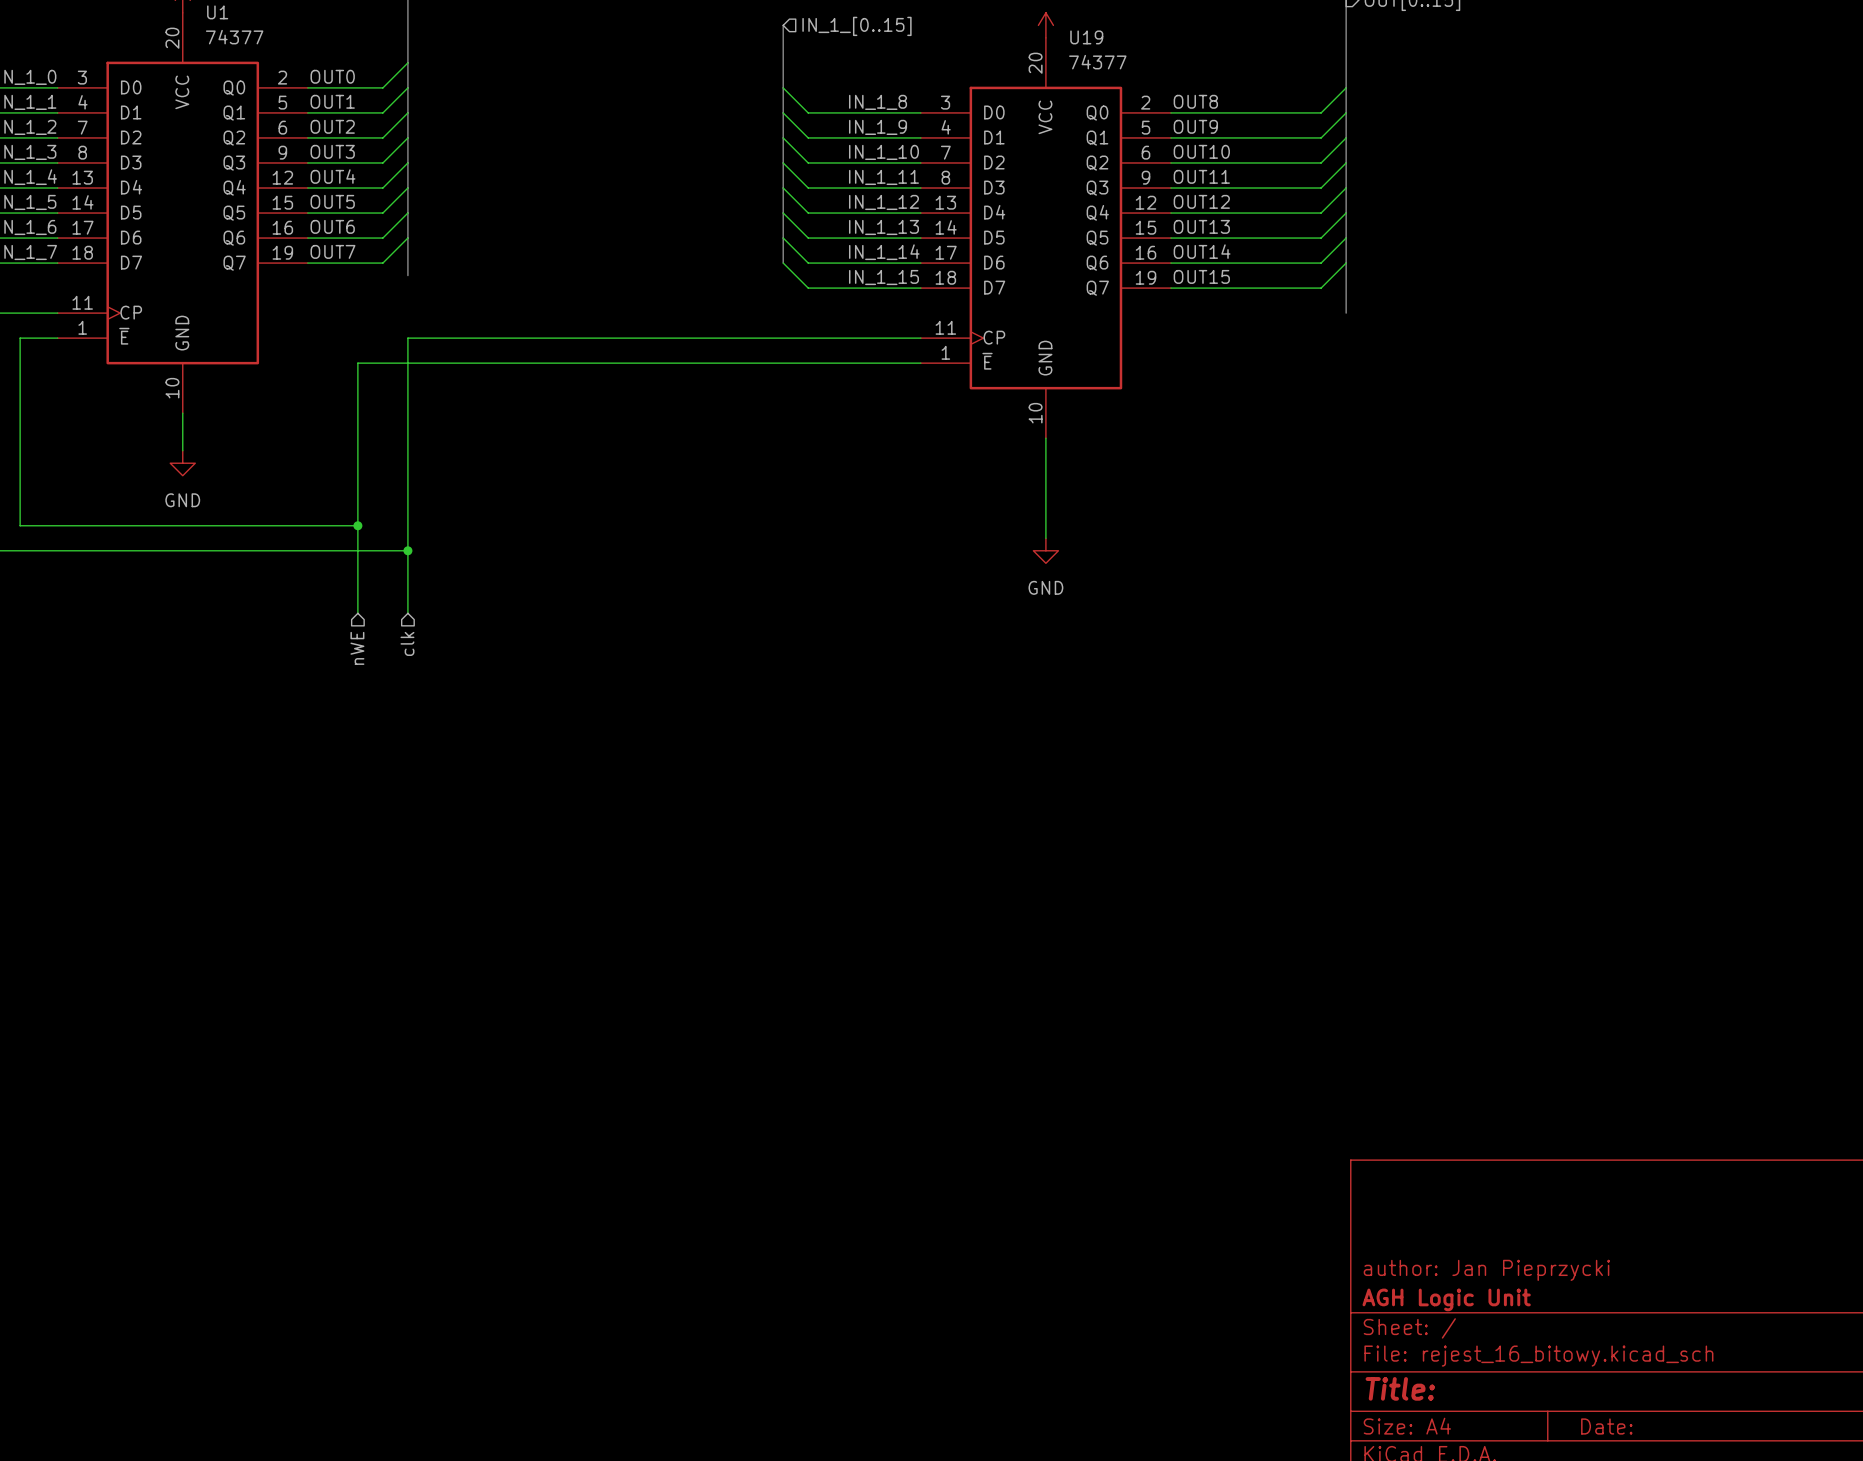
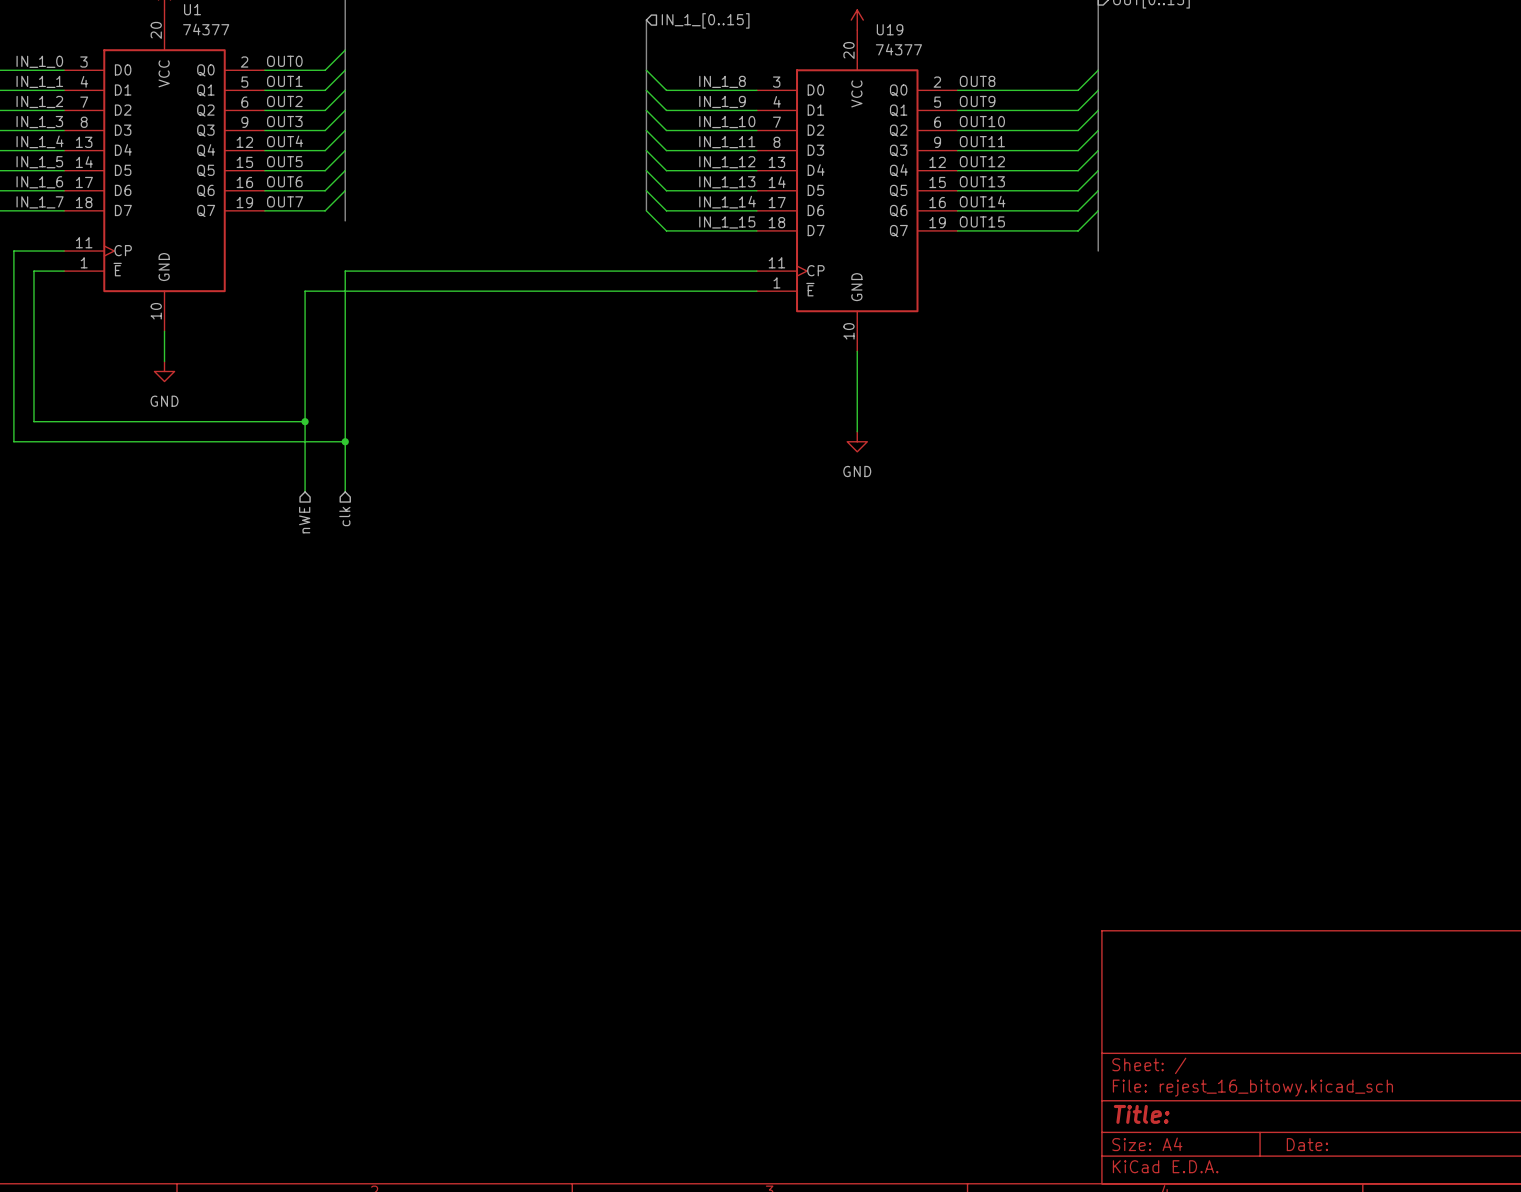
title block: author: Jan Pieprzycki (1486, 1270) -> none
title block: AGH Logic Unit (1446, 1299) -> none

